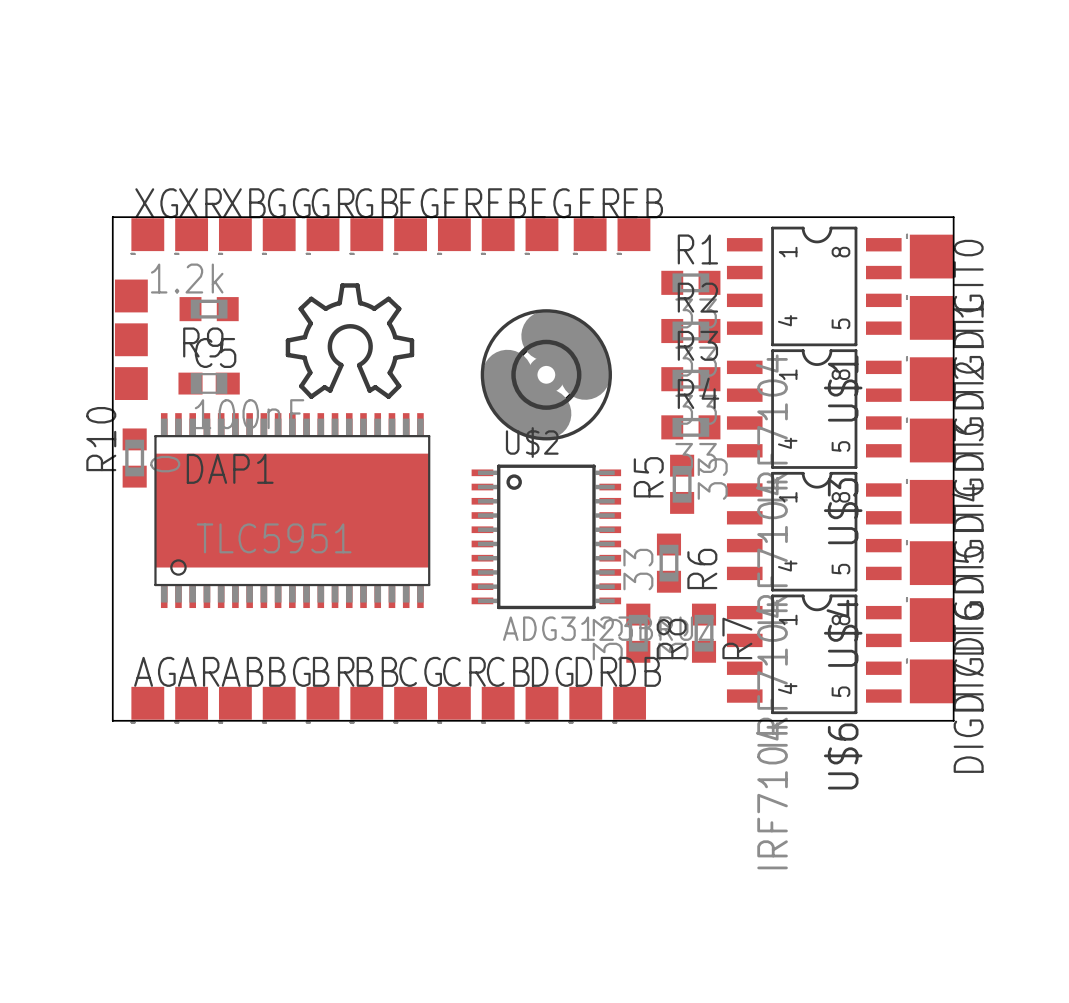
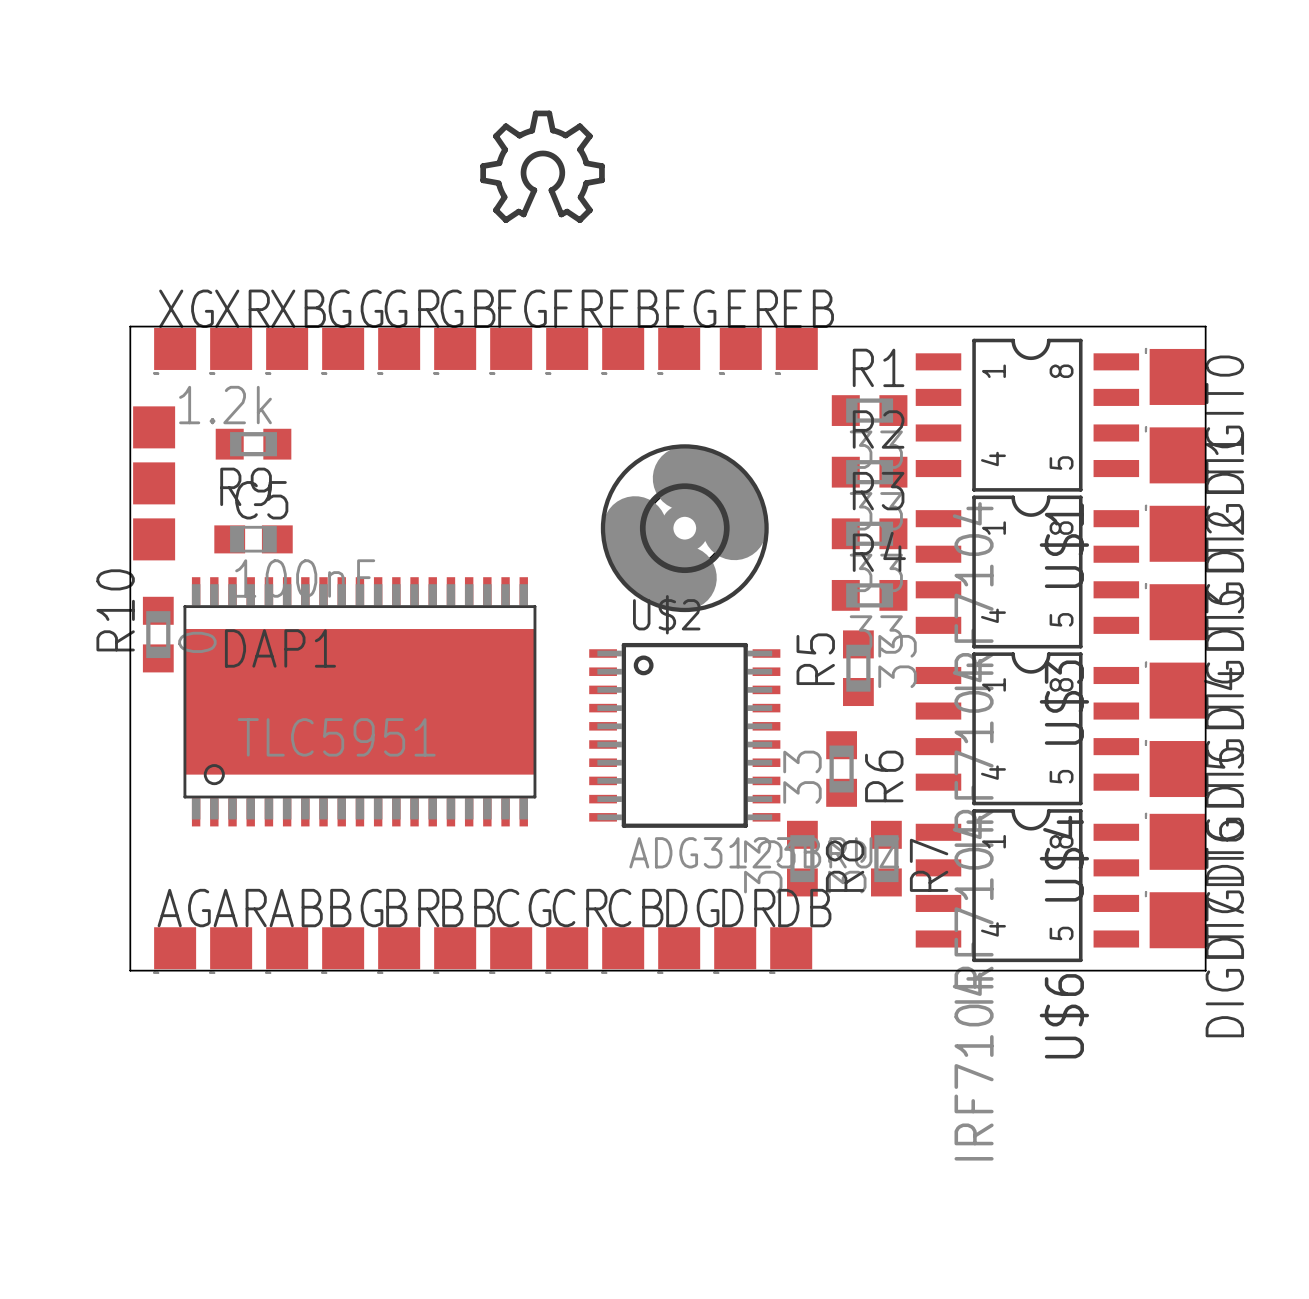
drawing: none -> [480, 110, 605, 223]
drawing: [285, 283, 415, 399] -> none

